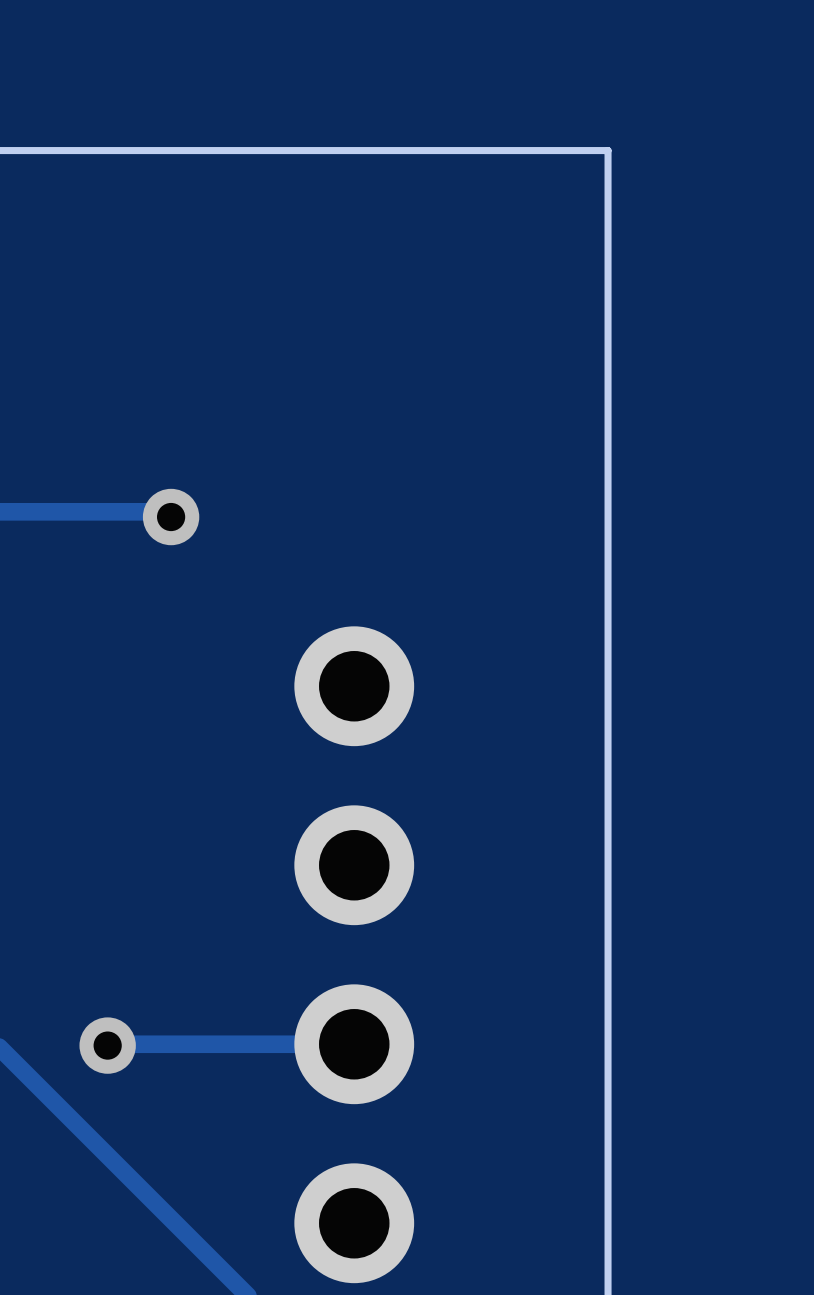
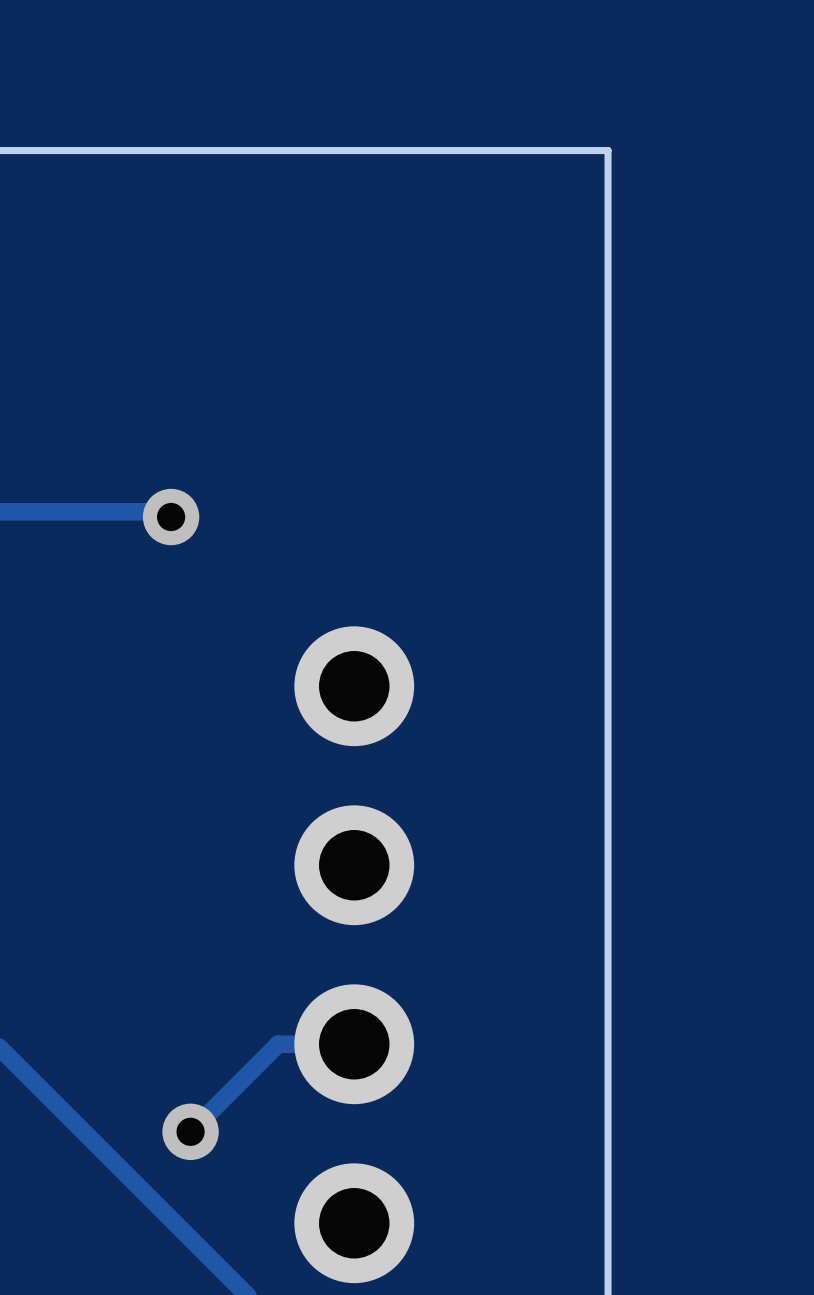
track: (278, 1044) (107, 1045) -> (278, 1044) (190, 1131)
via position: (107, 1045) -> (190, 1131)

